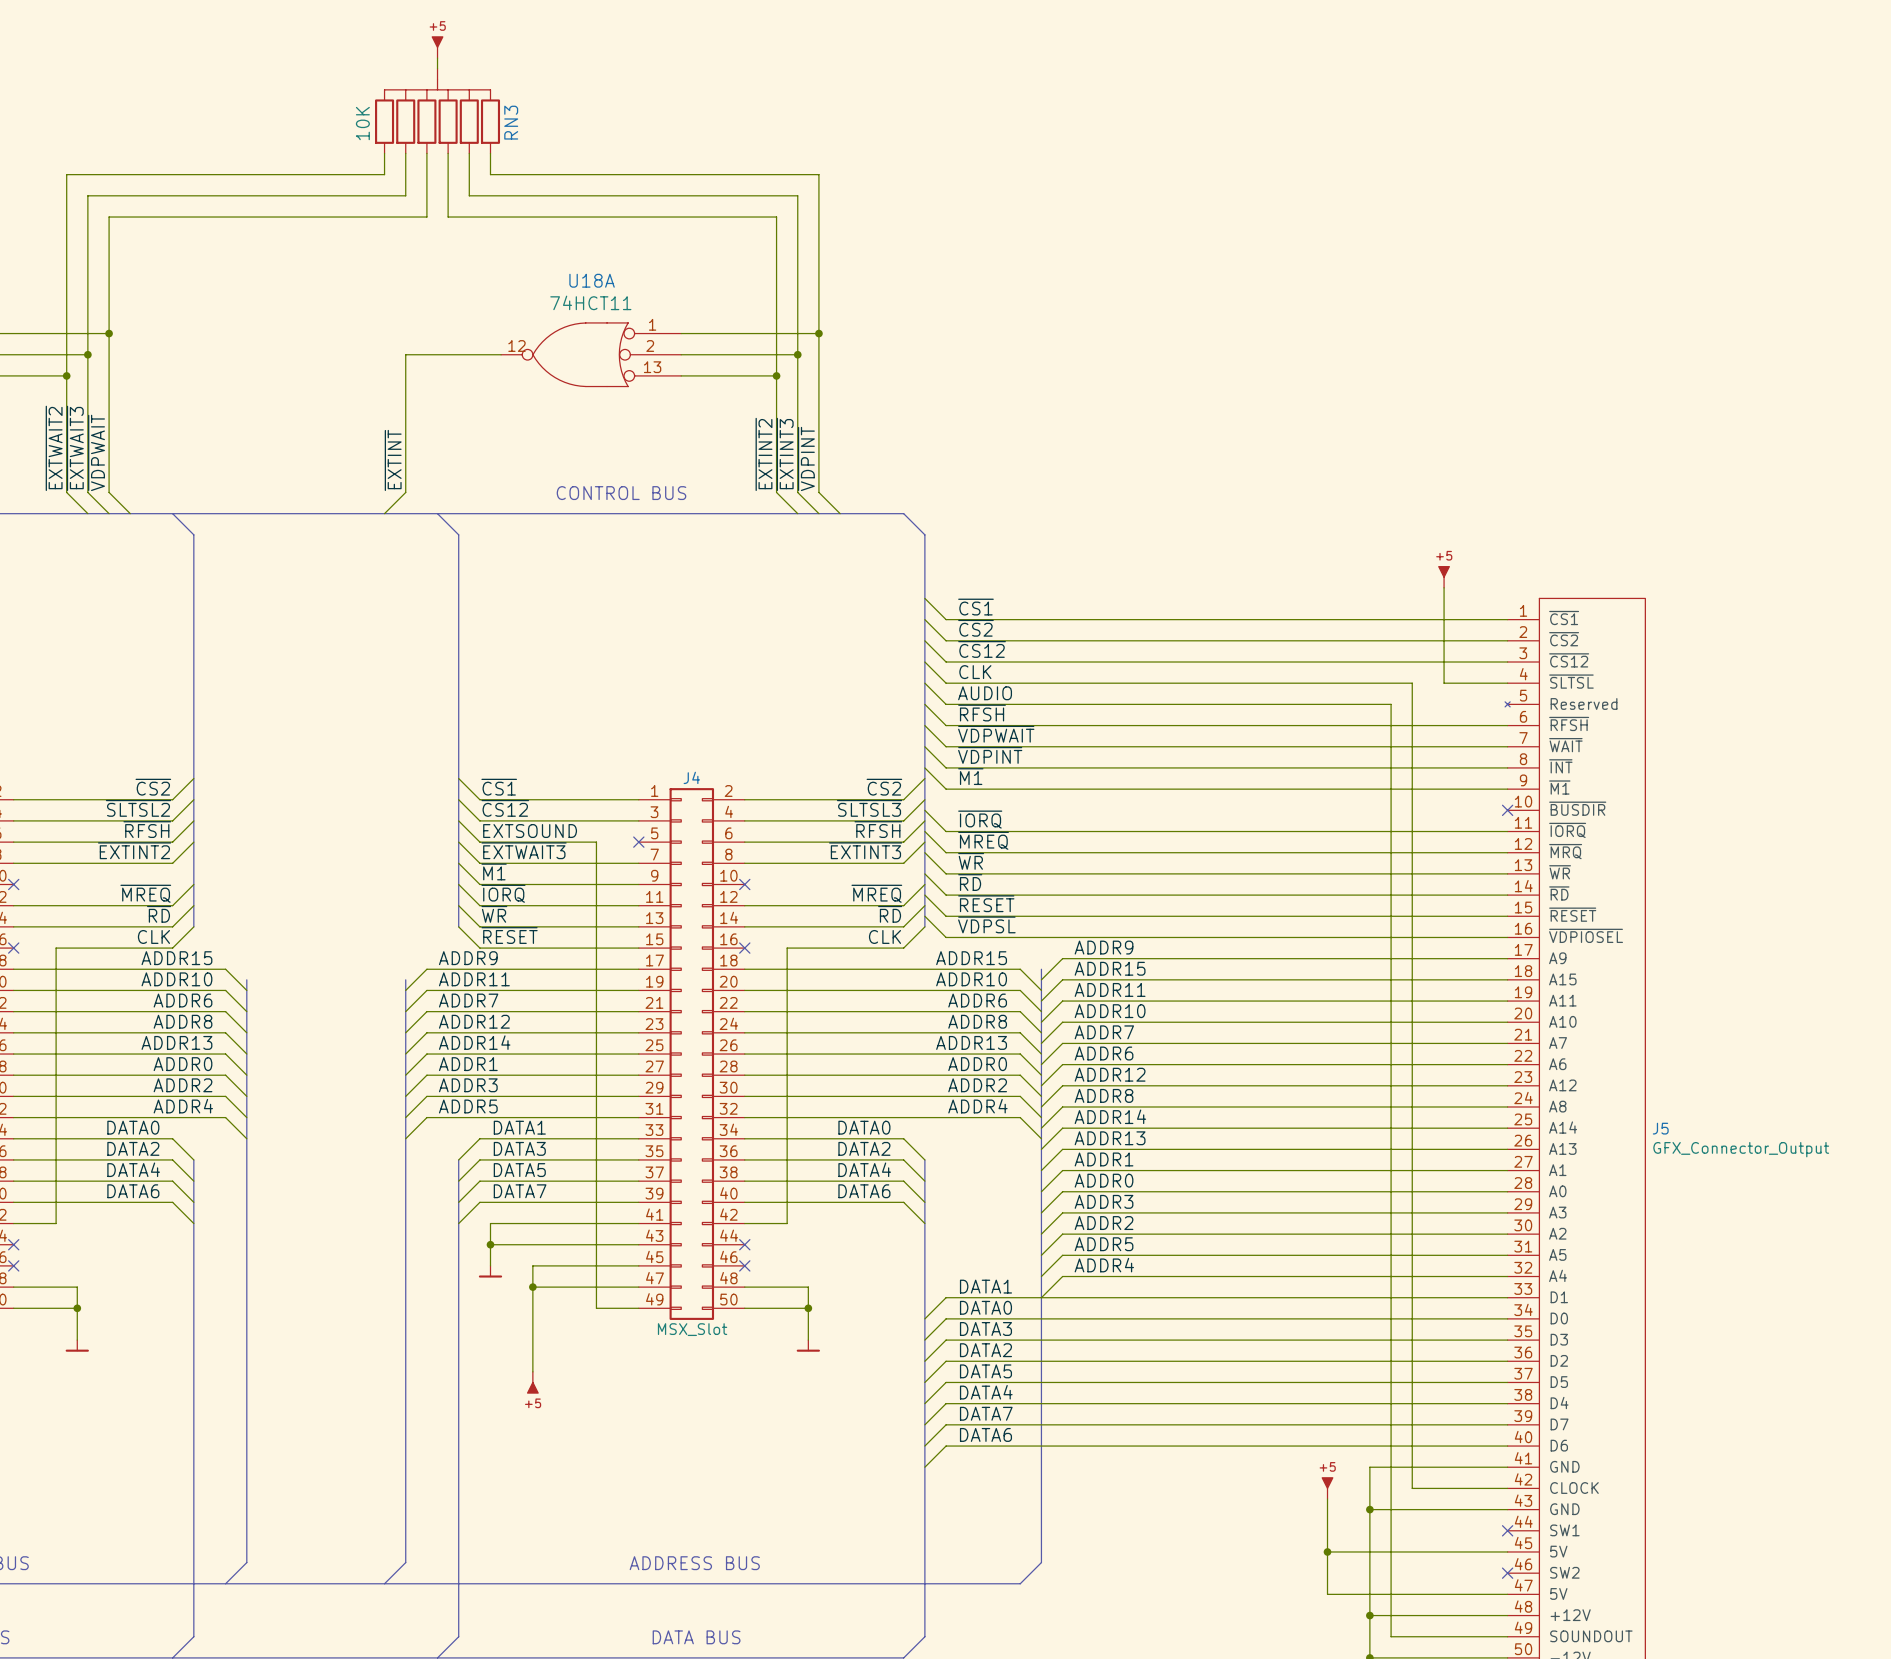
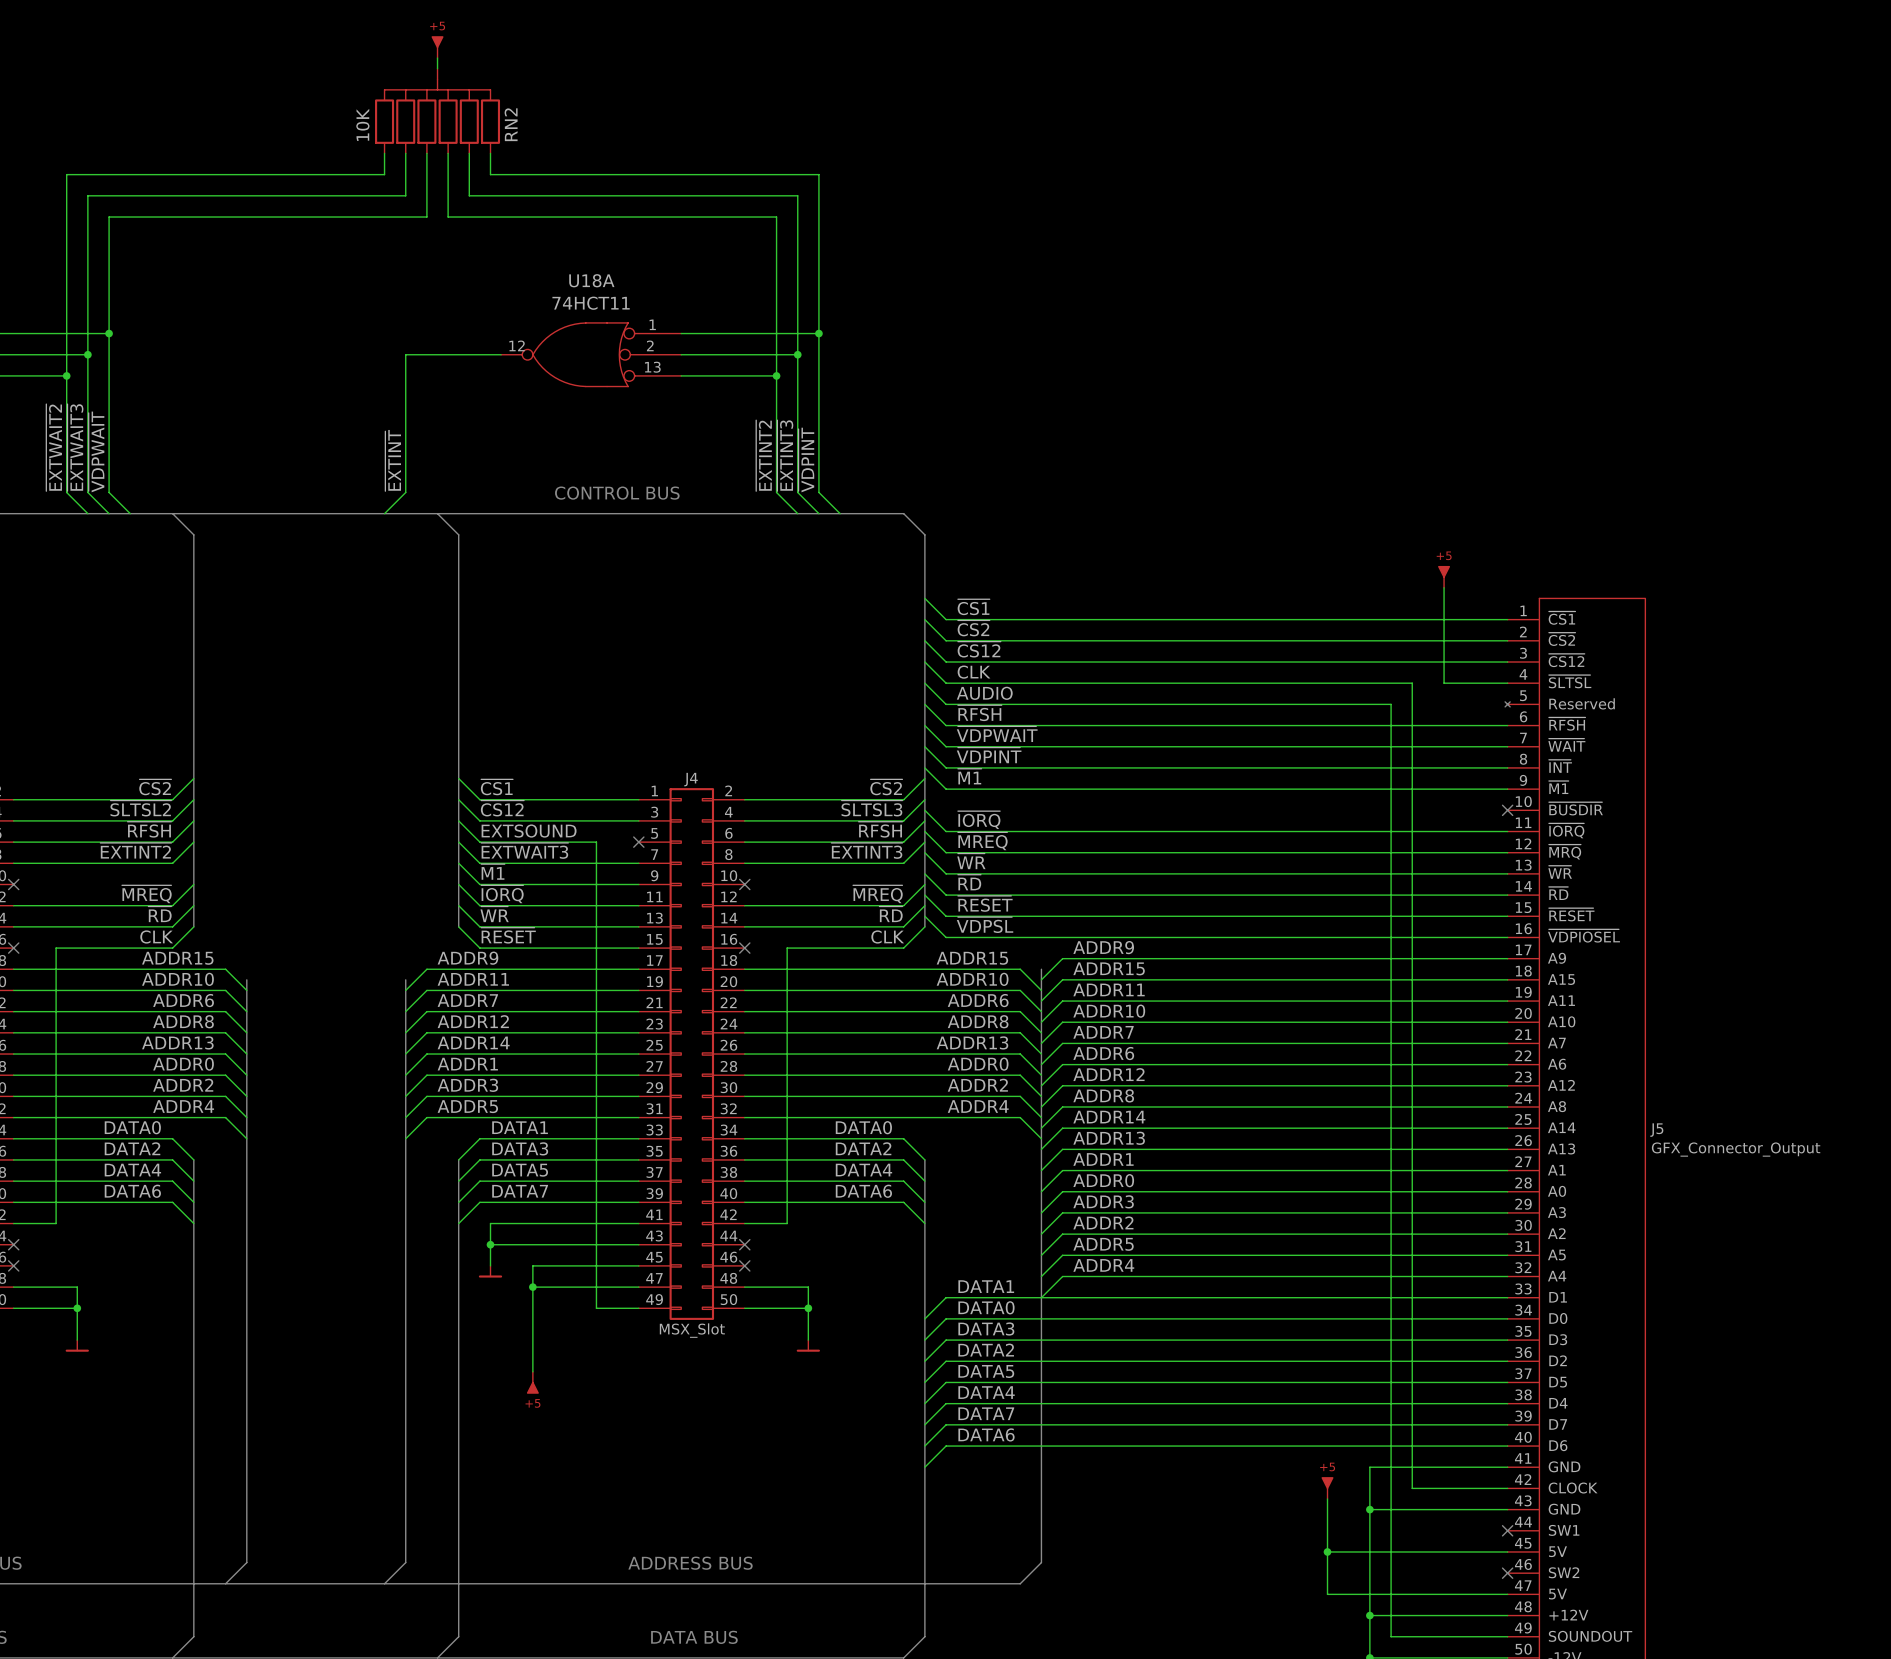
RN3 name: RN3 (511, 122) -> RN2 (511, 124)

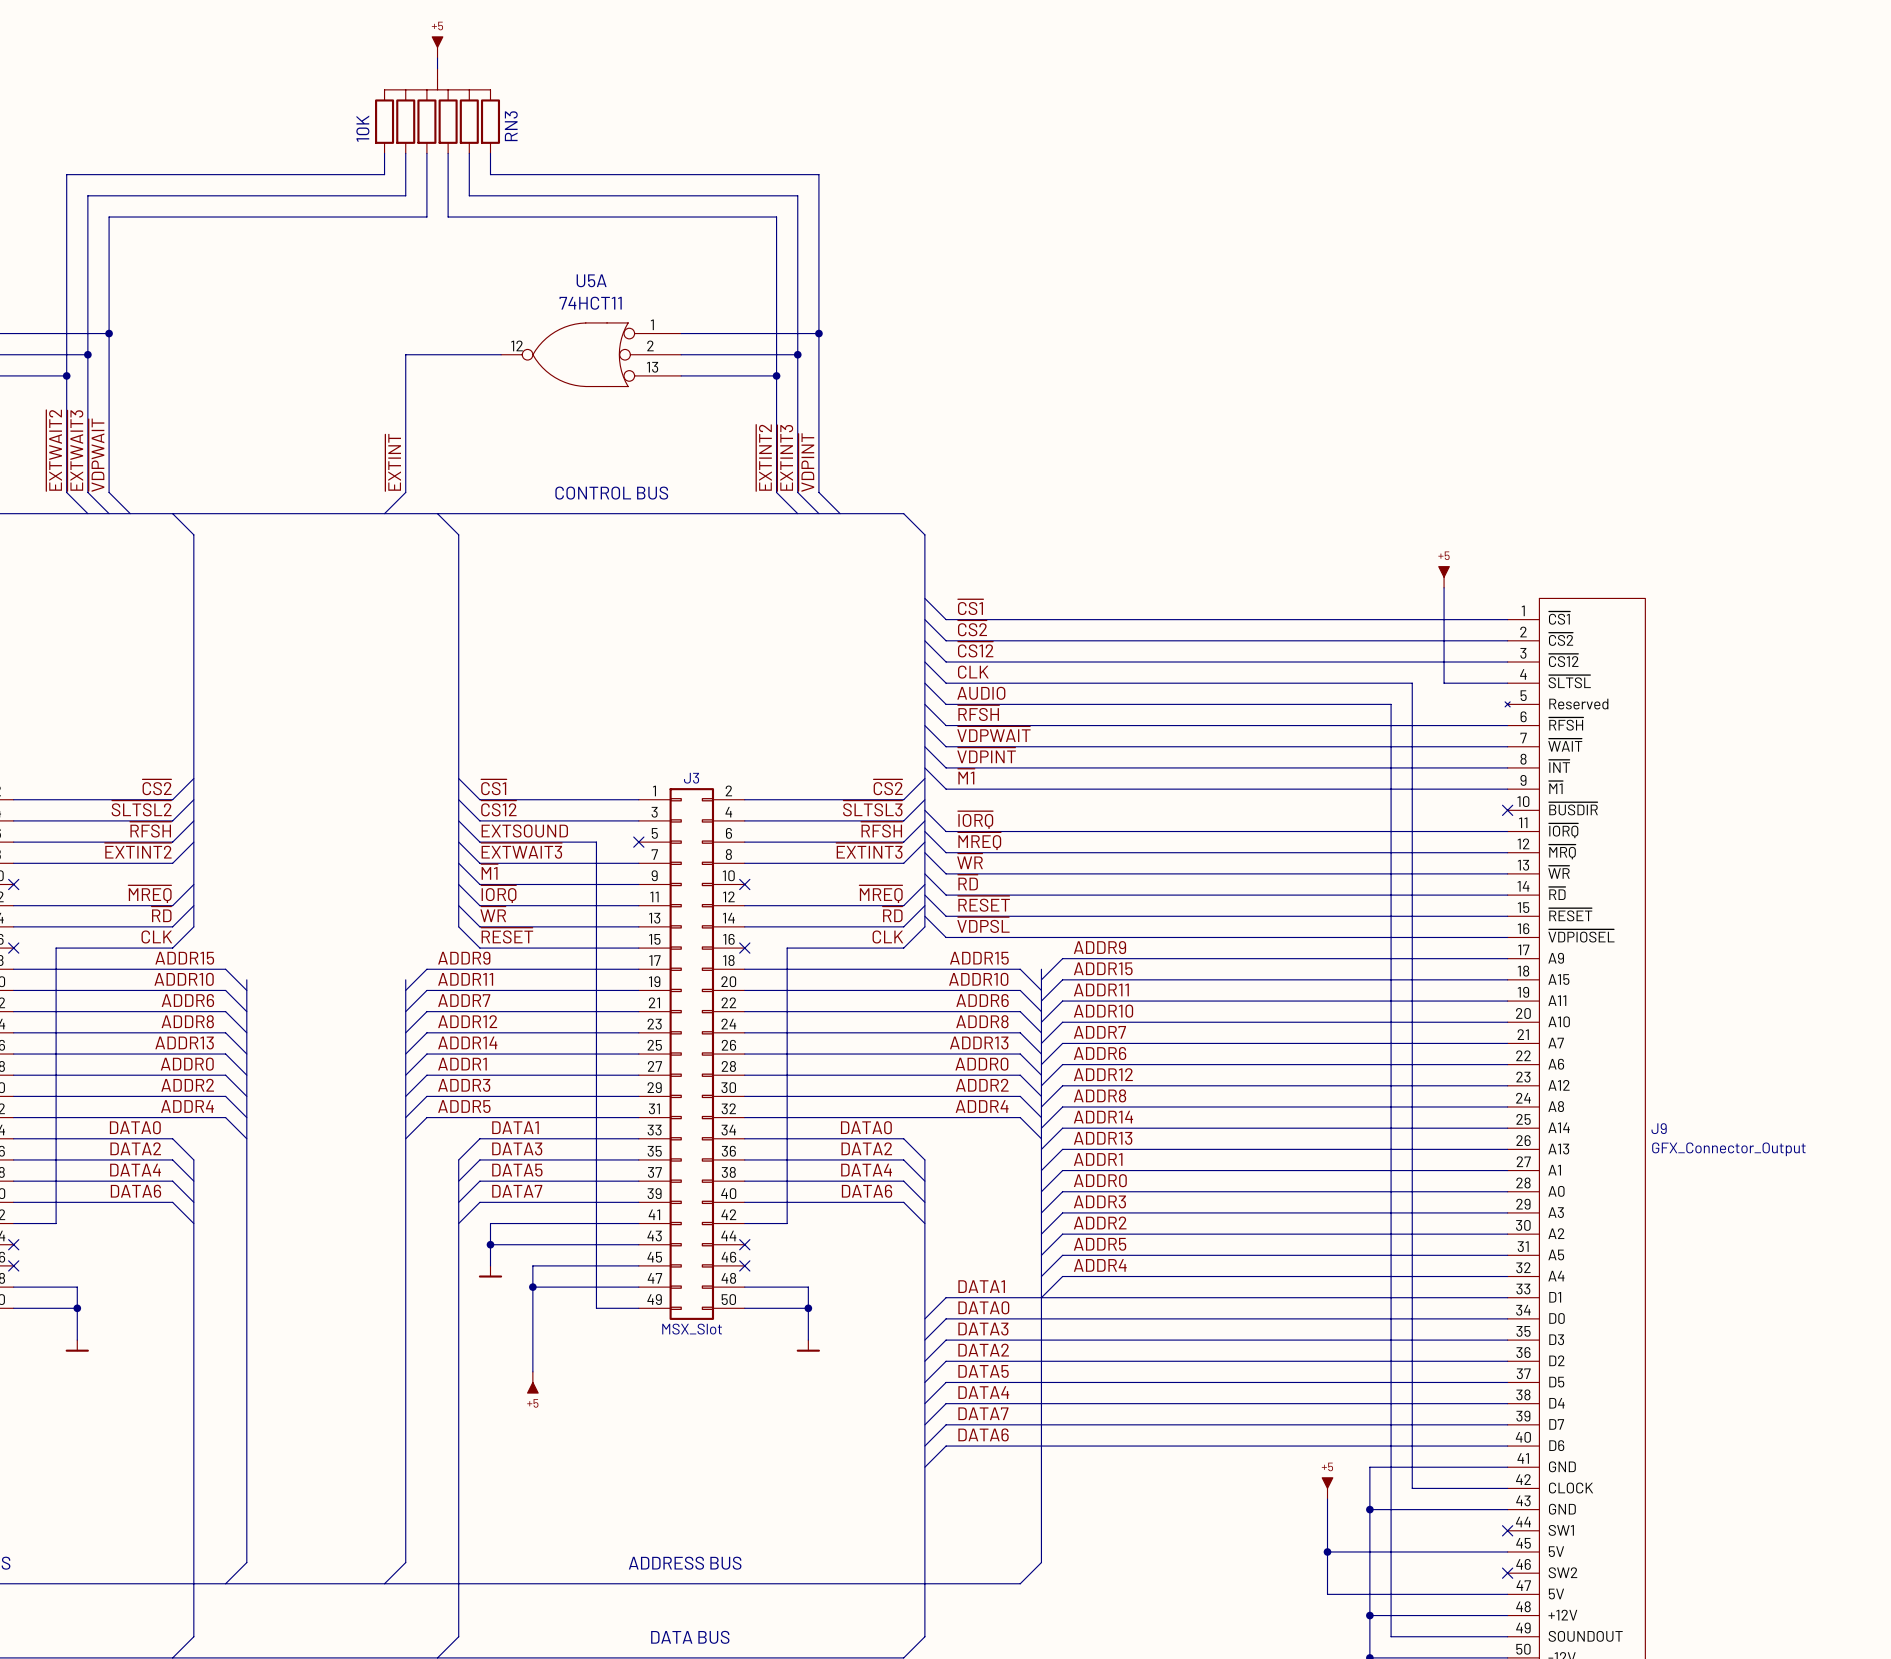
RN2 name: RN2 (511, 124) -> RN3 (511, 126)
U18A name: U18A (591, 280) -> U5A (591, 280)
J4 name: J4 (691, 779) -> J3 (691, 778)
J5 name: J5 (1656, 1130) -> J9 (1659, 1128)

